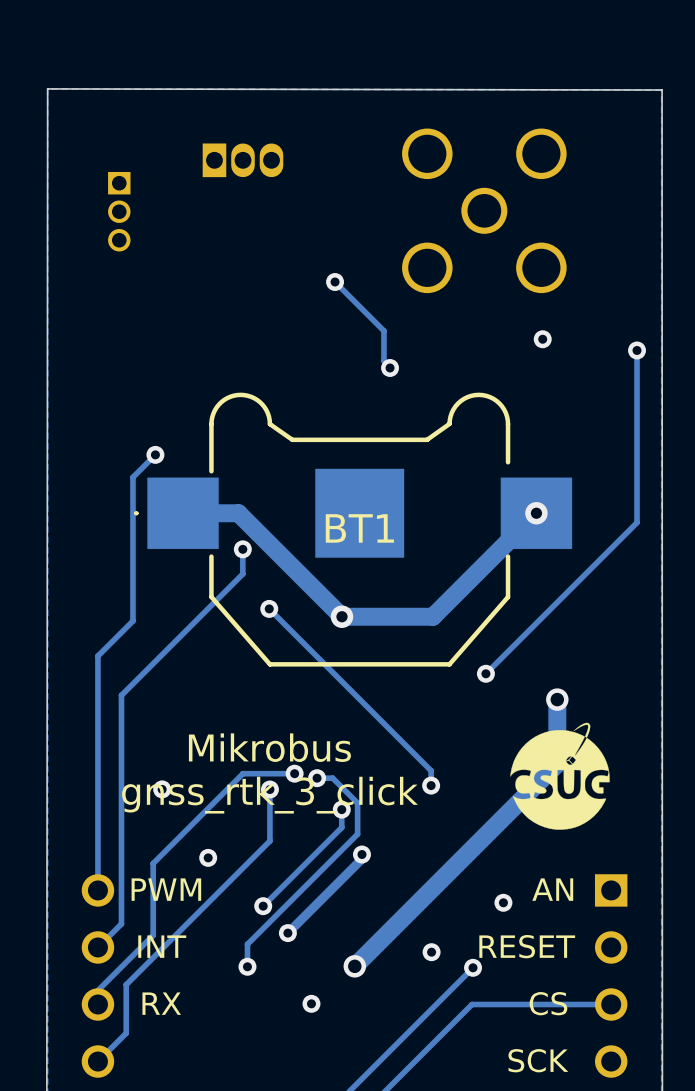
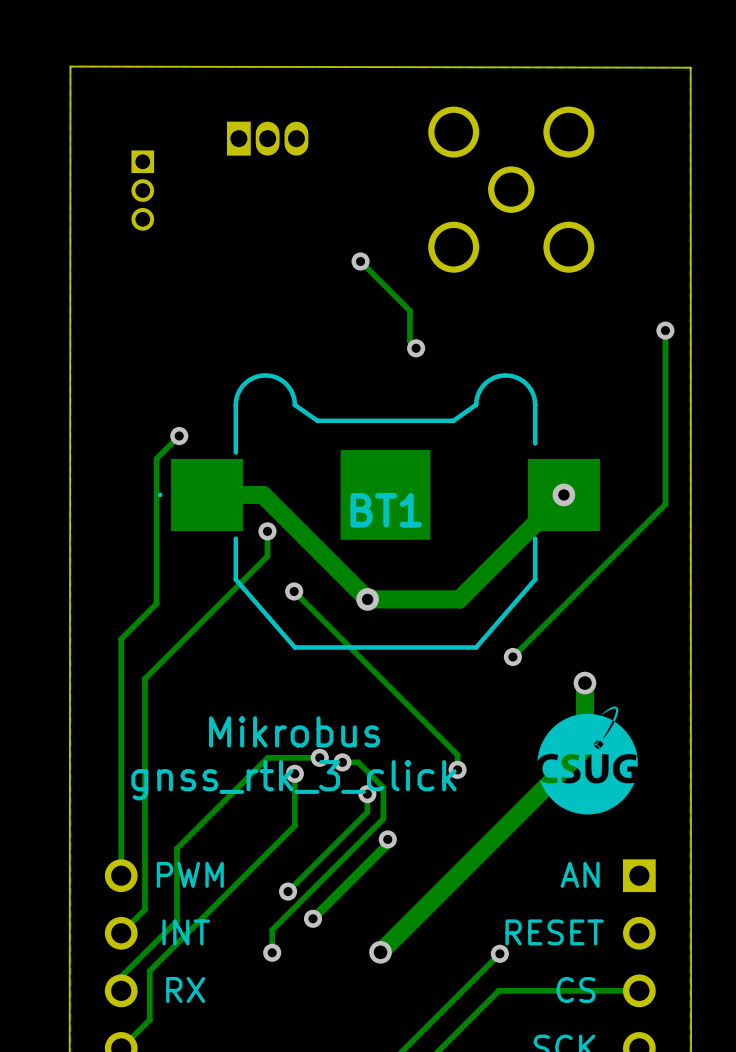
via: (542, 339) -> none
via: (162, 789) -> none
via: (208, 857) -> none
via: (503, 902) -> none
via: (431, 952) -> none
via: (311, 1003) -> none

